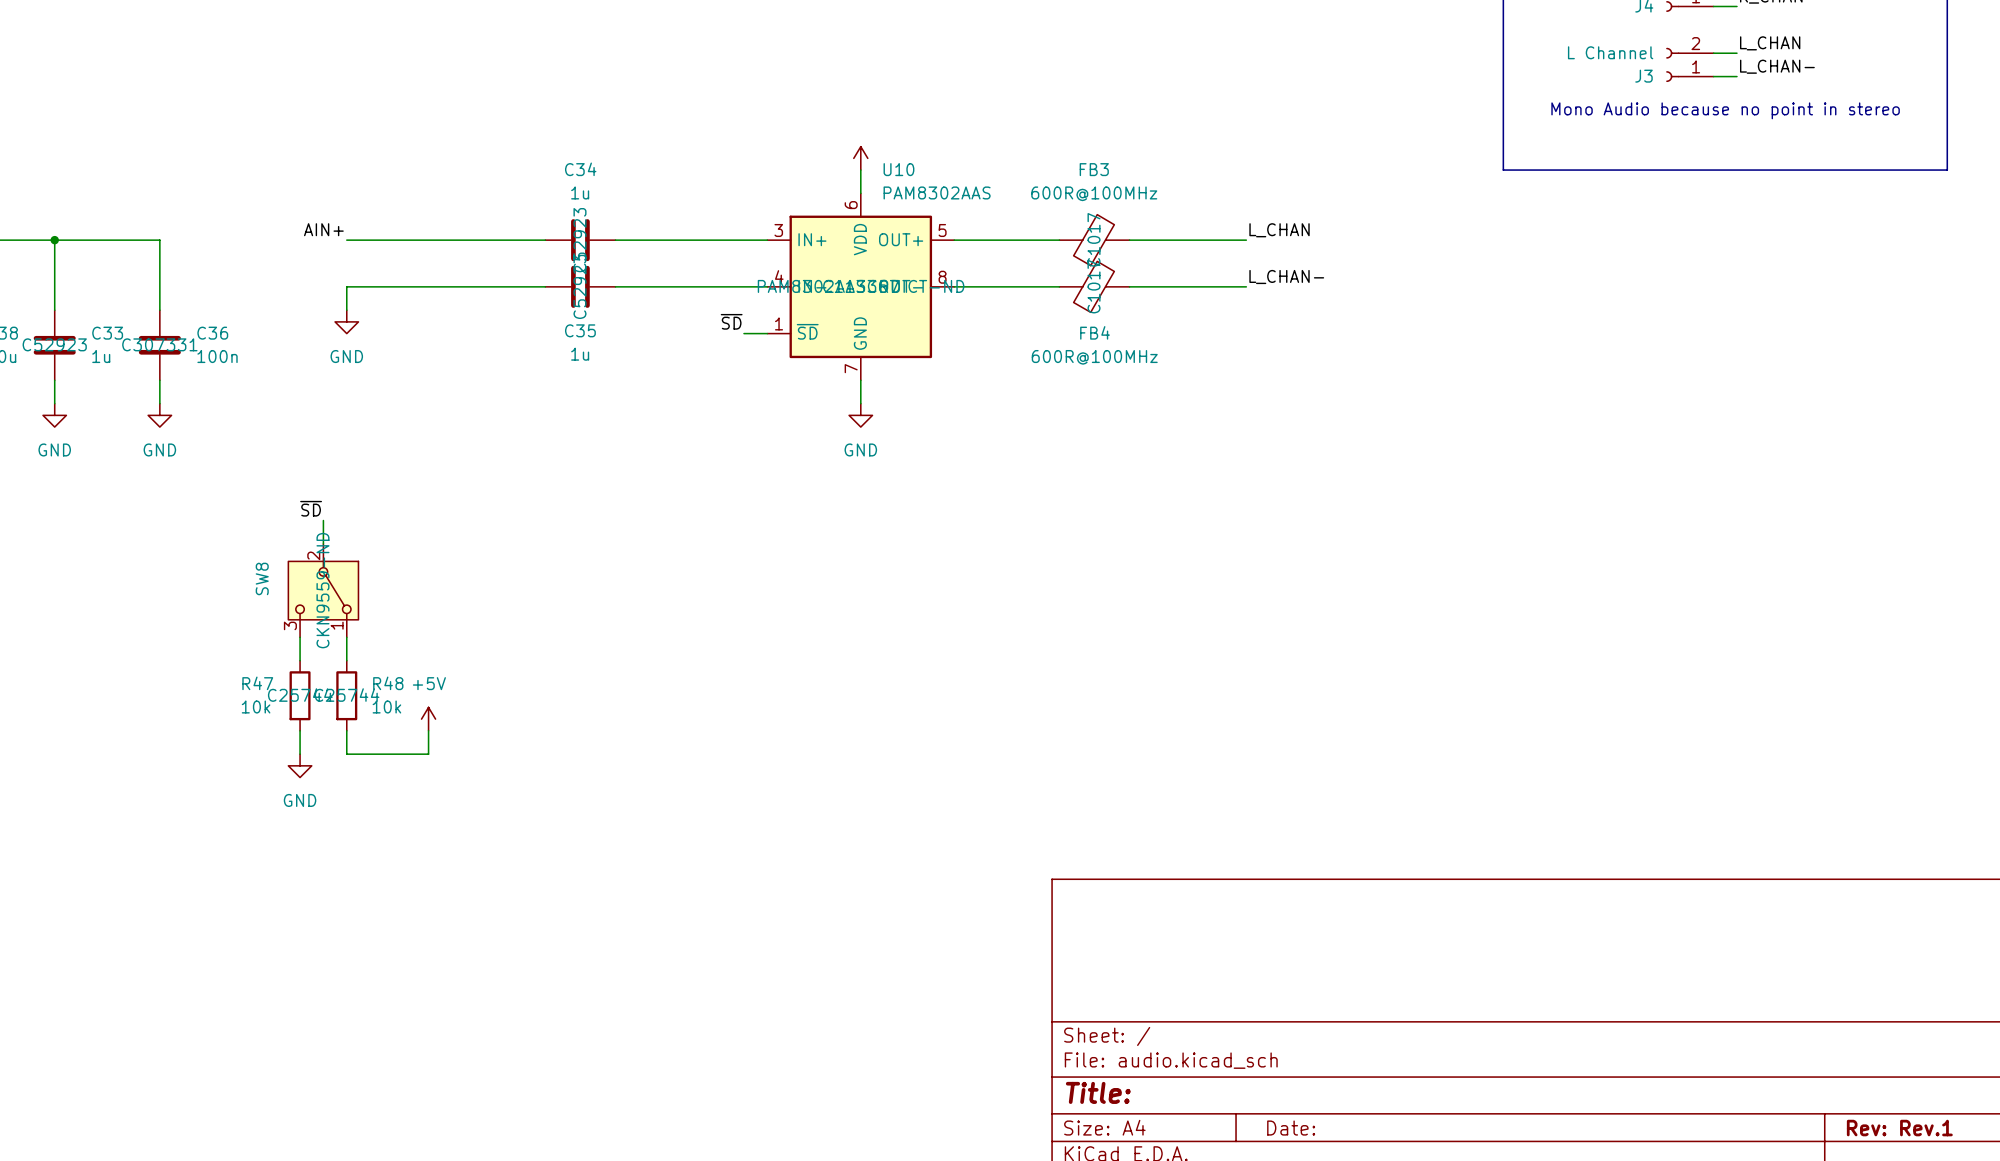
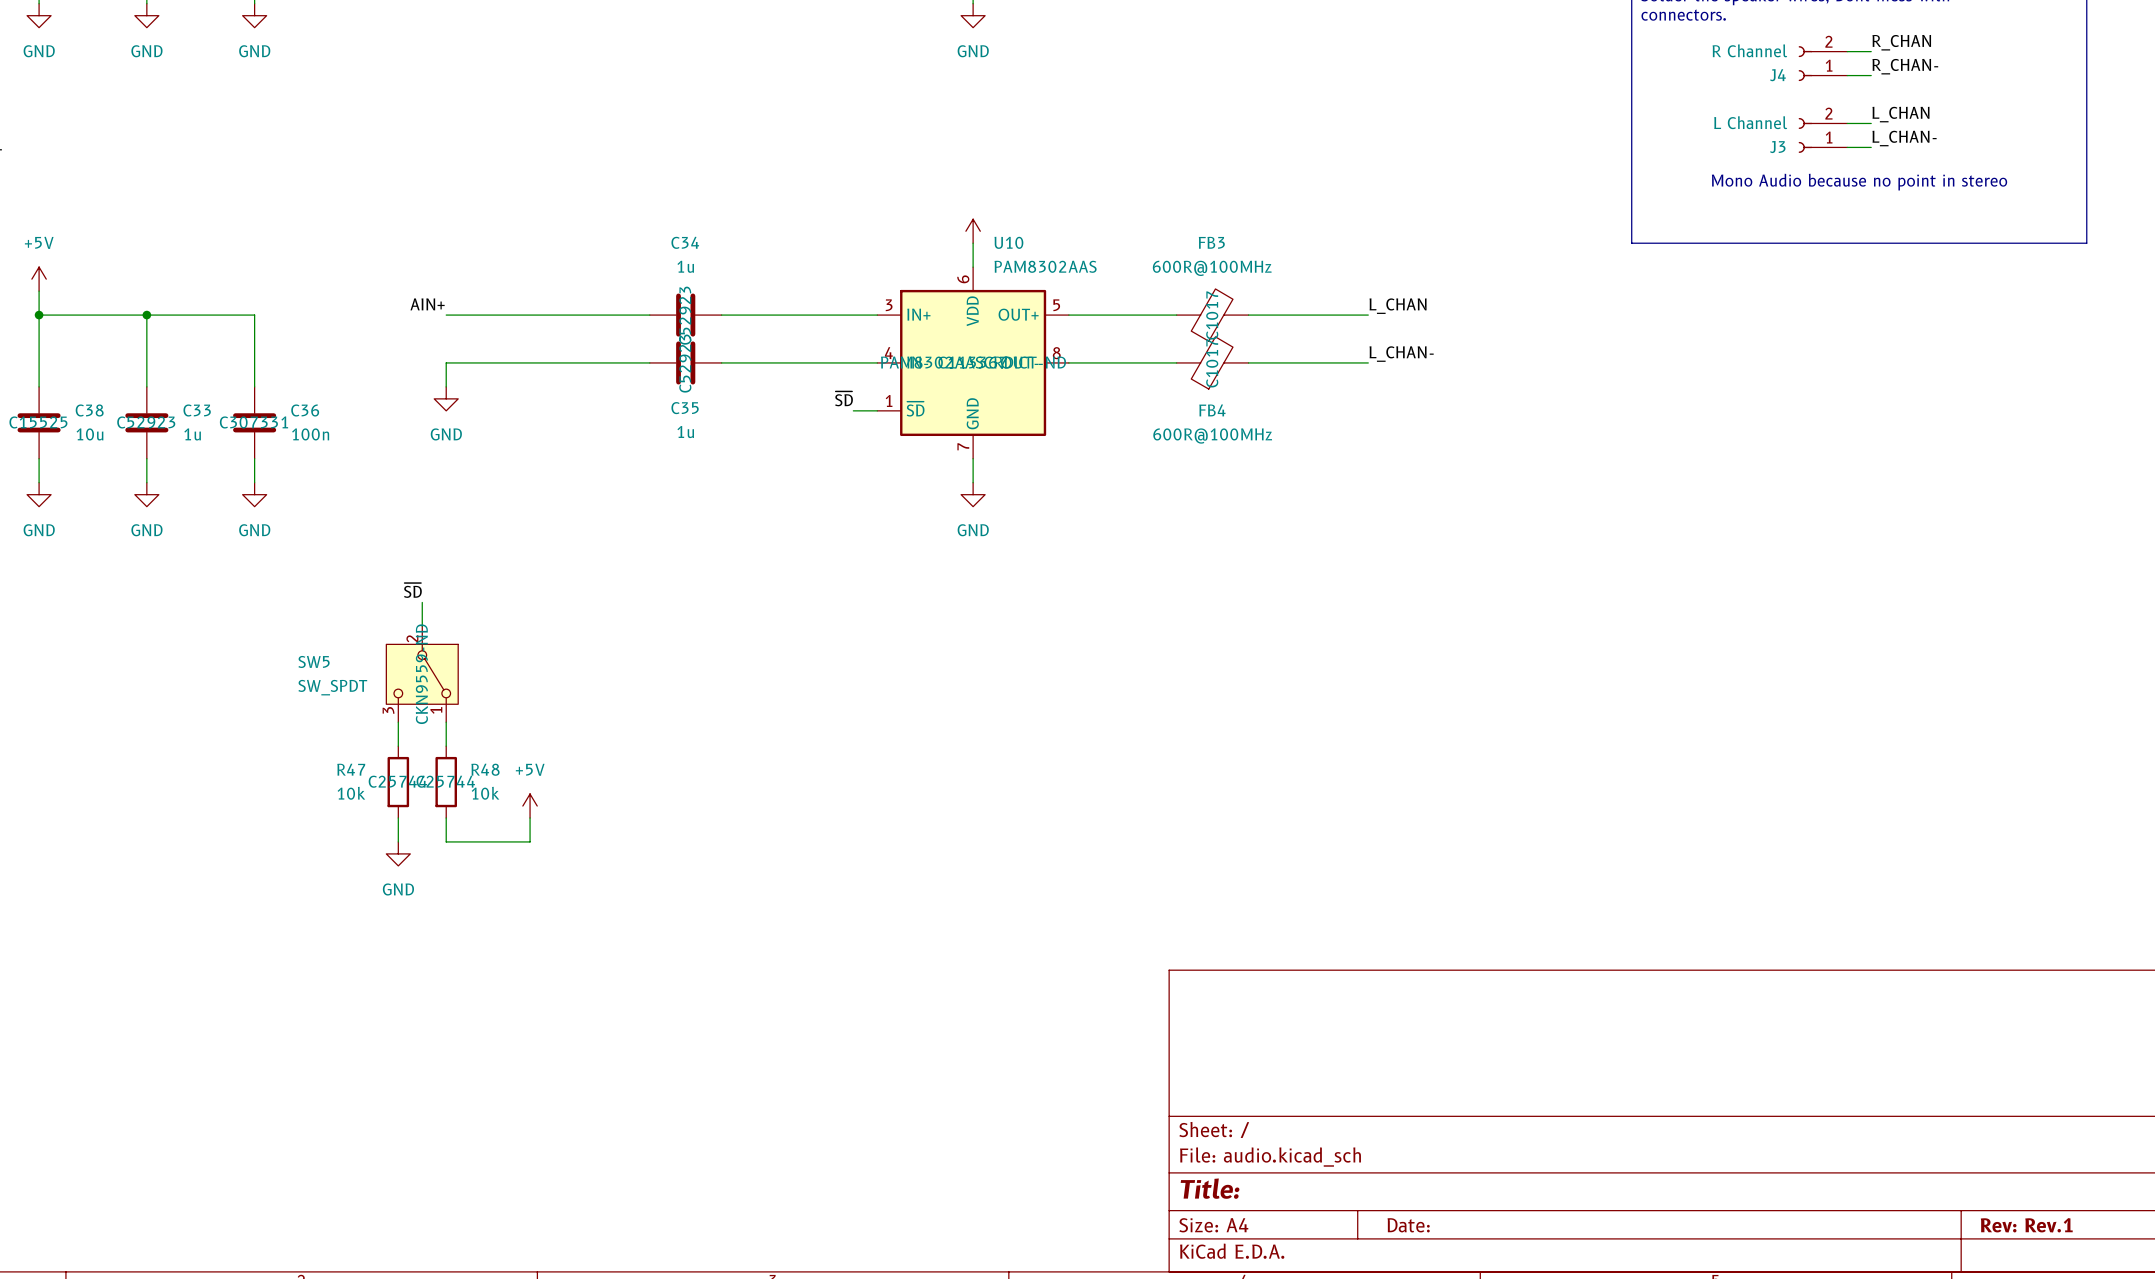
SW8 name: SW8 (262, 578) -> SW5 (314, 661)
SW8 value: none -> SW_SPDT (332, 687)

